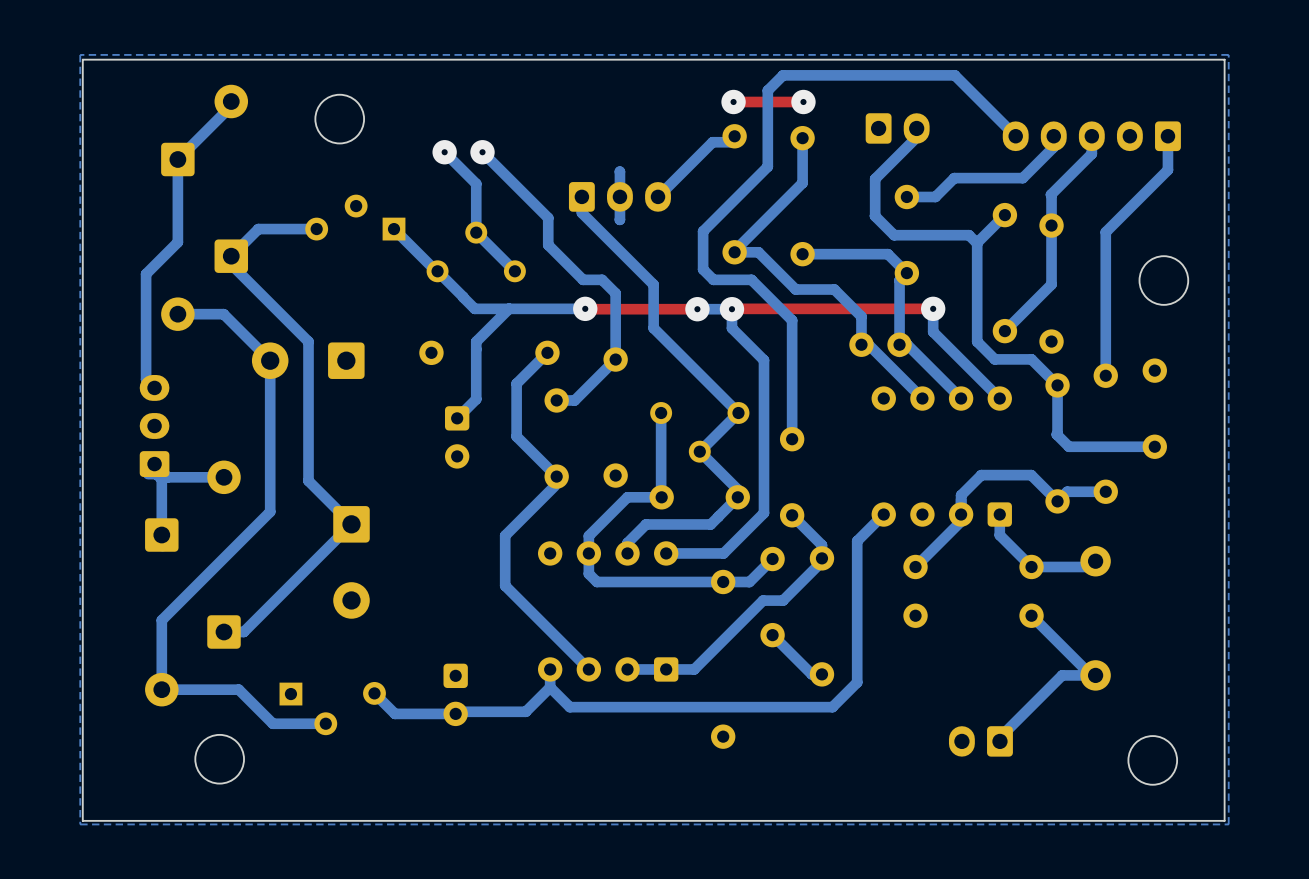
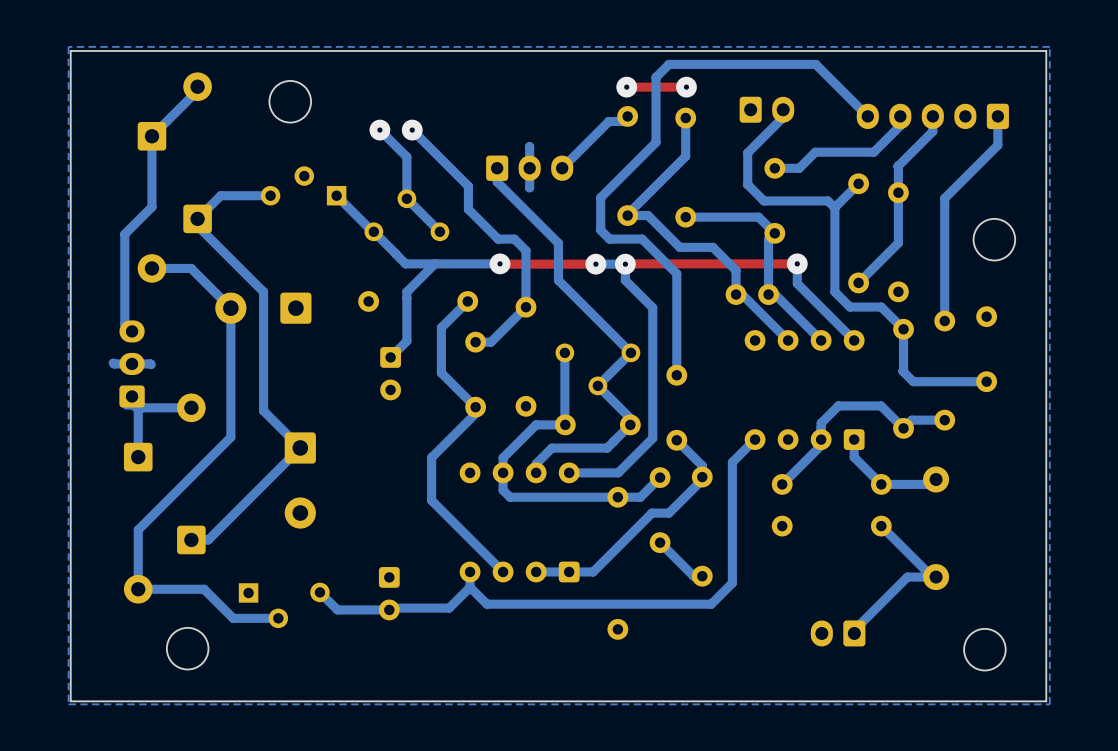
bottom track: none -> (113, 362) (151, 364)

